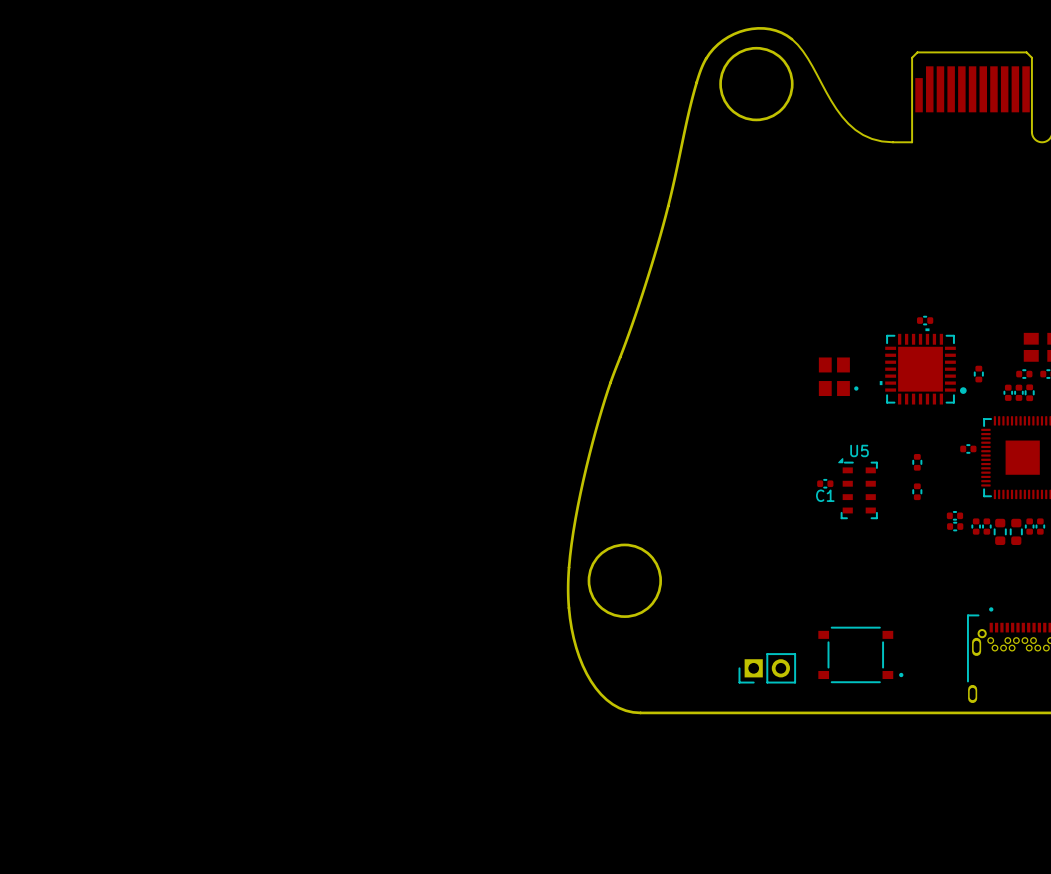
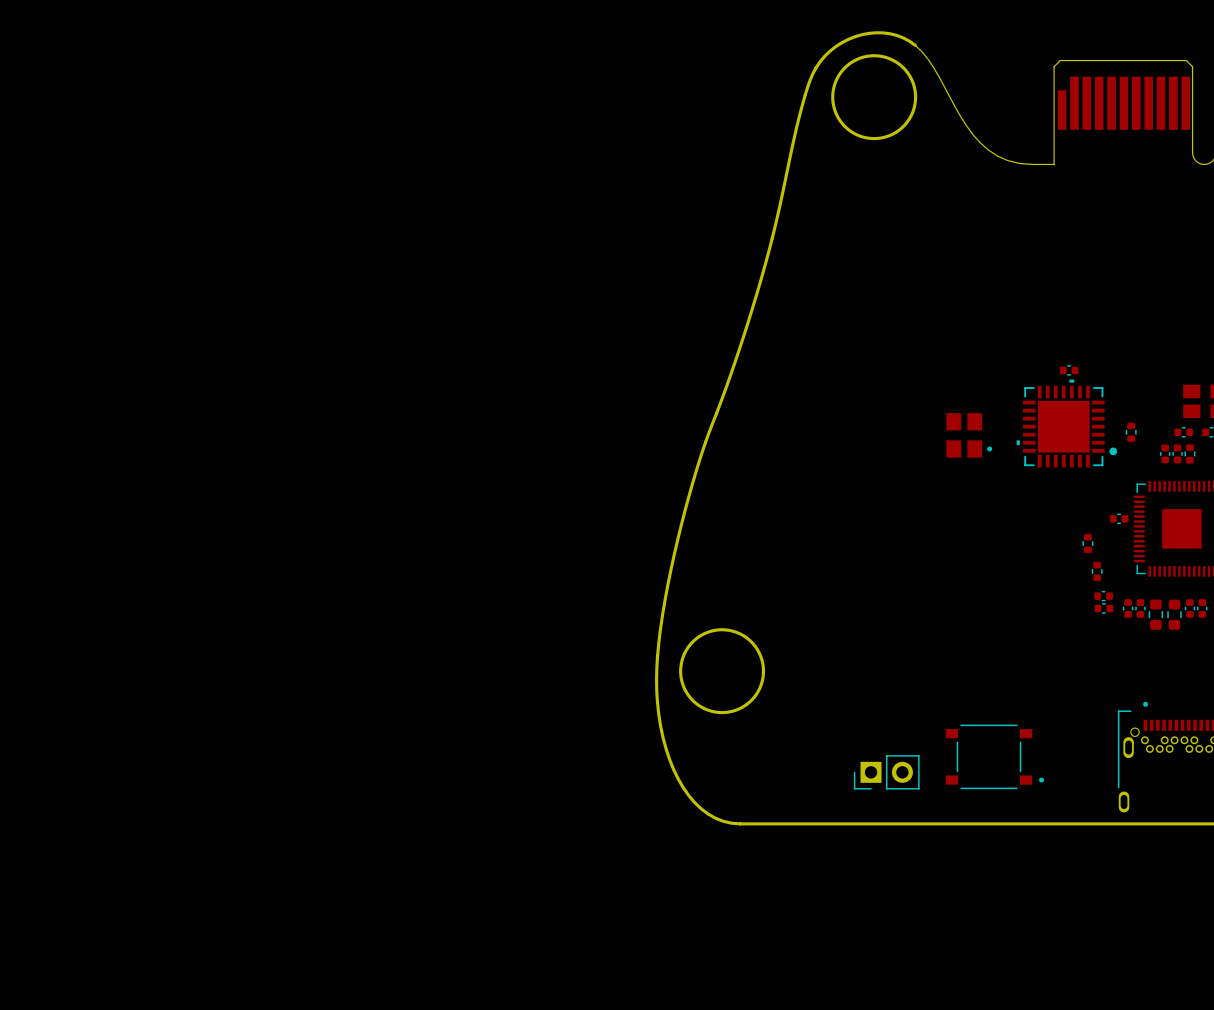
part: (917, 462) -> none
part: none -> (1087, 543)
C1: (825, 483) -> none
U5: (857, 488) -> none
part: (917, 491) -> none
part: none -> (1097, 571)

